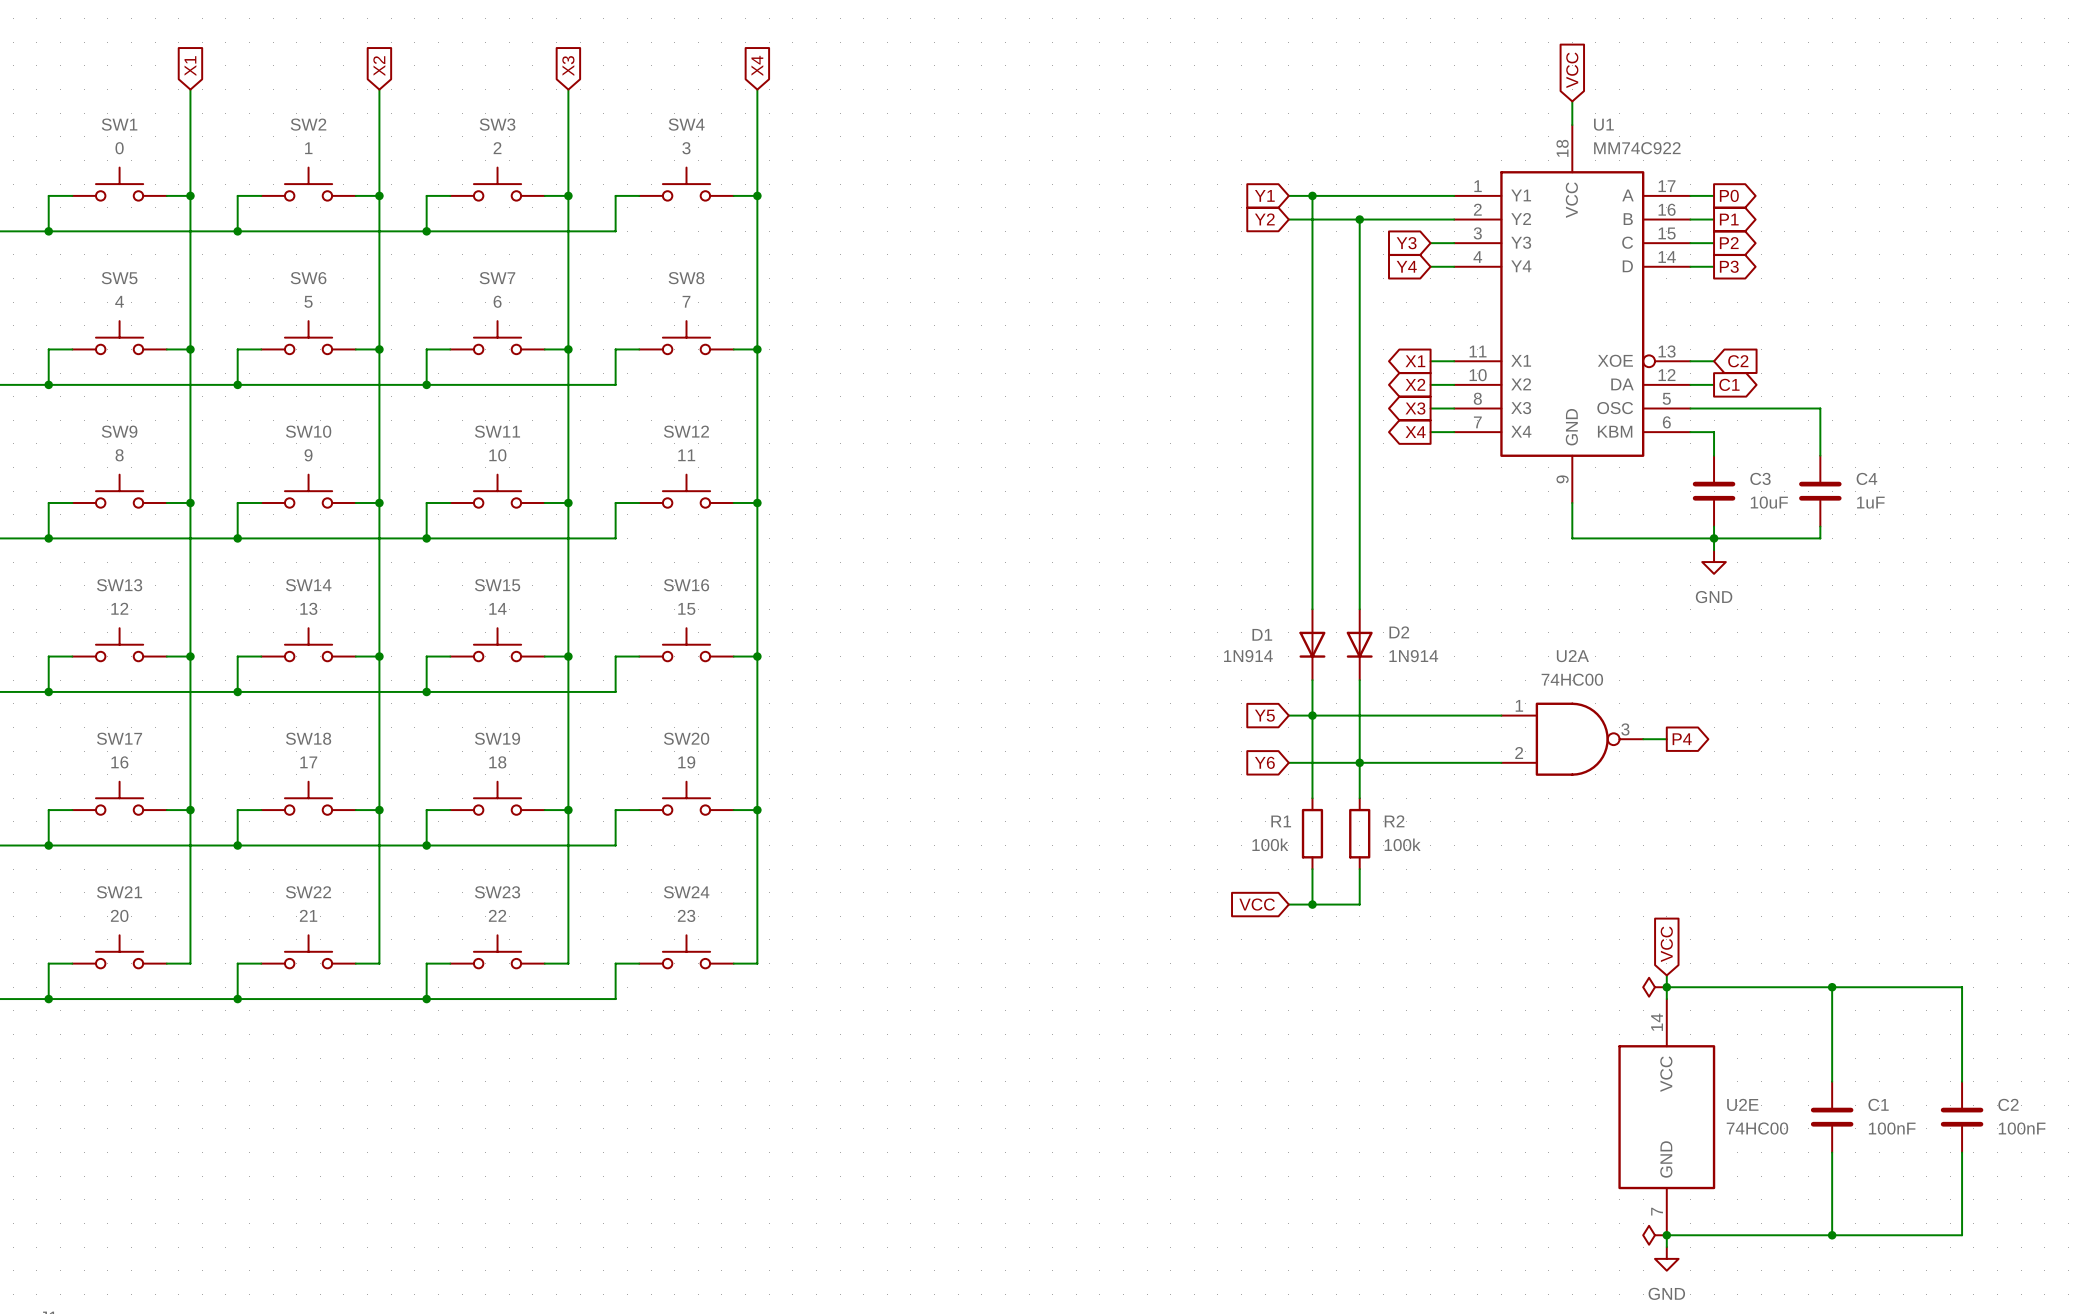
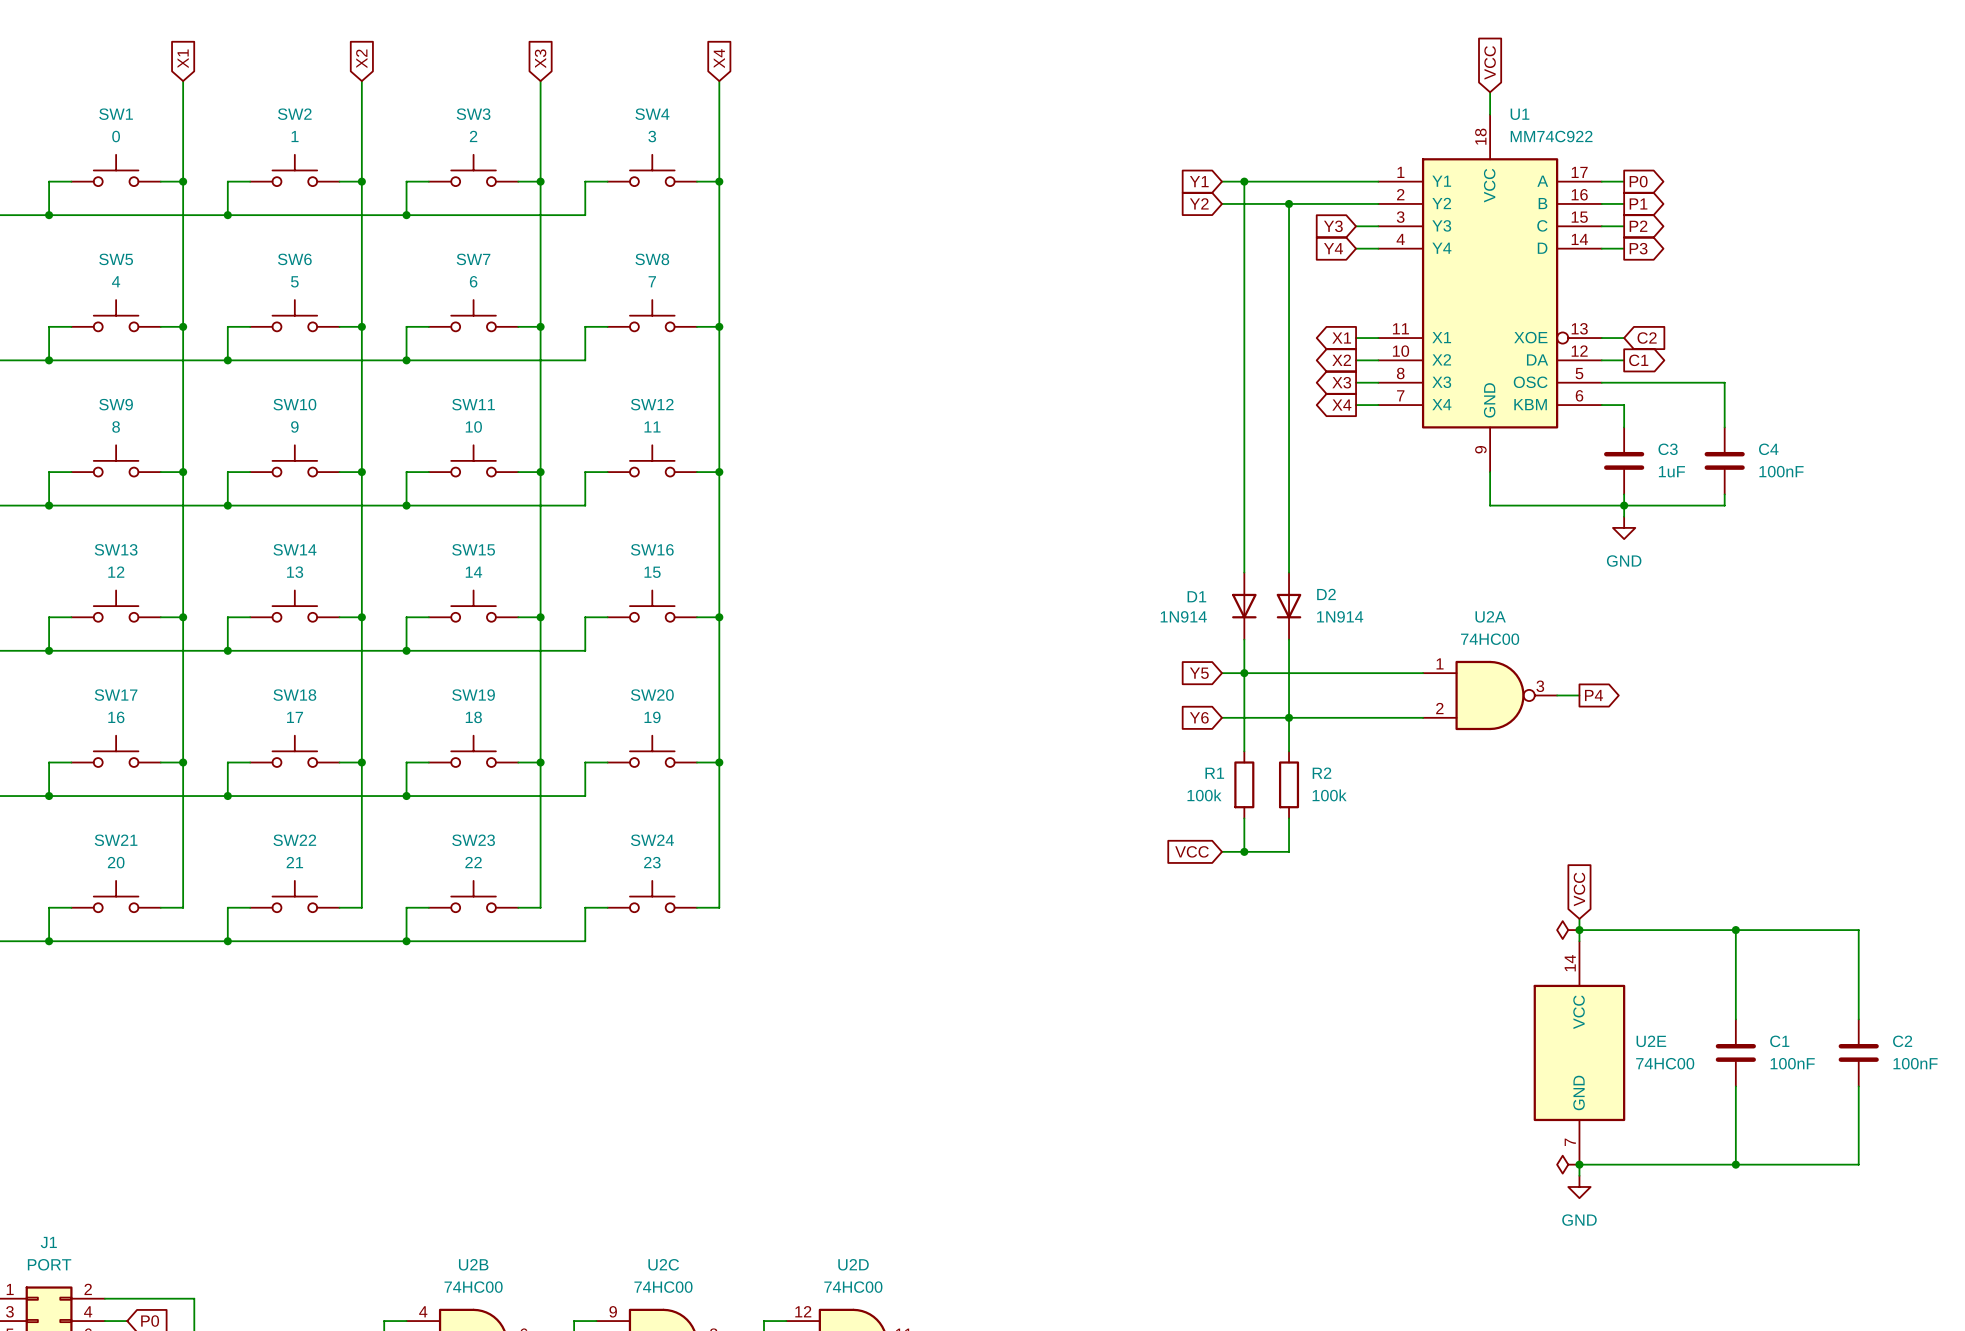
C3 value: 10uF (1769, 502) -> 1uF (1671, 471)
C4 value: 1uF (1870, 502) -> 100nF (1781, 471)

